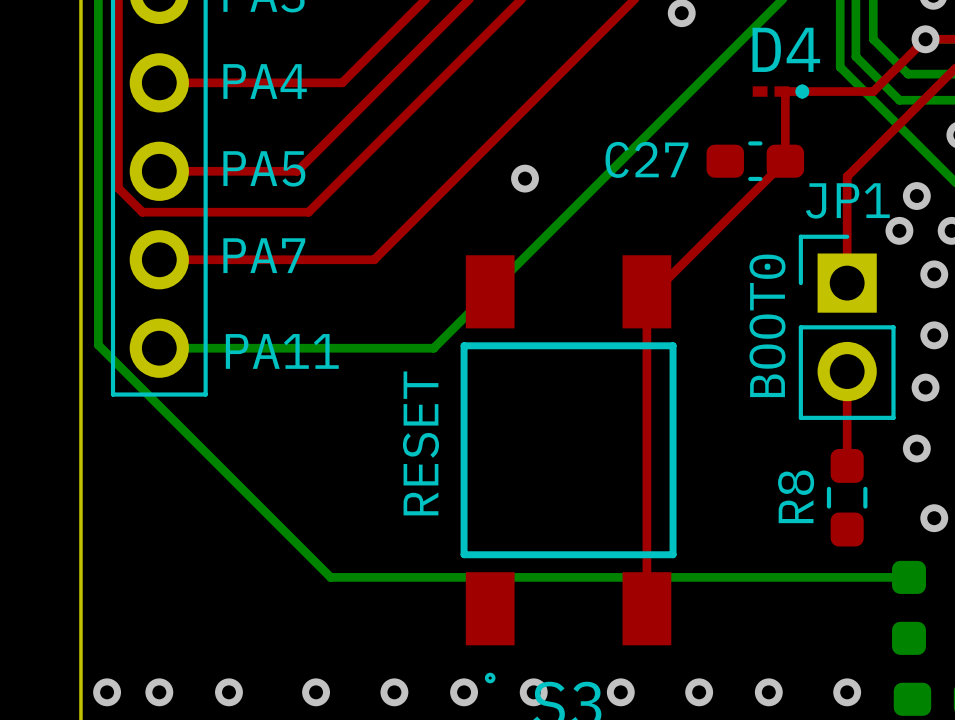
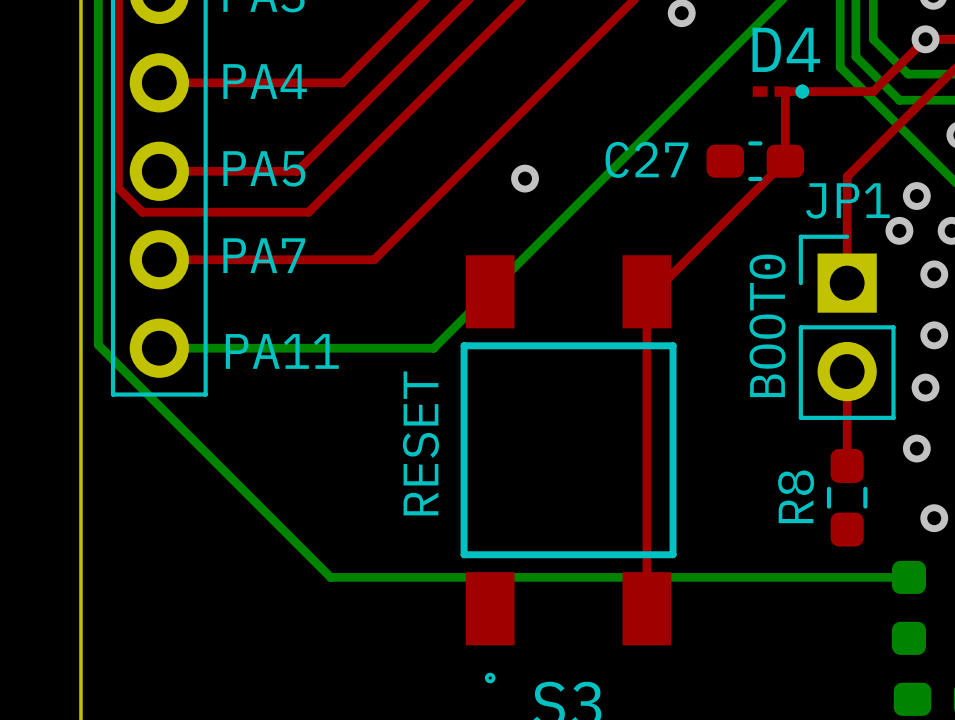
via: (107, 692) -> none
via: (159, 692) -> none
via: (228, 692) -> none
via: (316, 692) -> none
via: (394, 692) -> none
via: (464, 692) -> none
via: (533, 692) -> none
via: (620, 692) -> none
via: (699, 692) -> none
via: (768, 692) -> none
via: (847, 692) -> none

